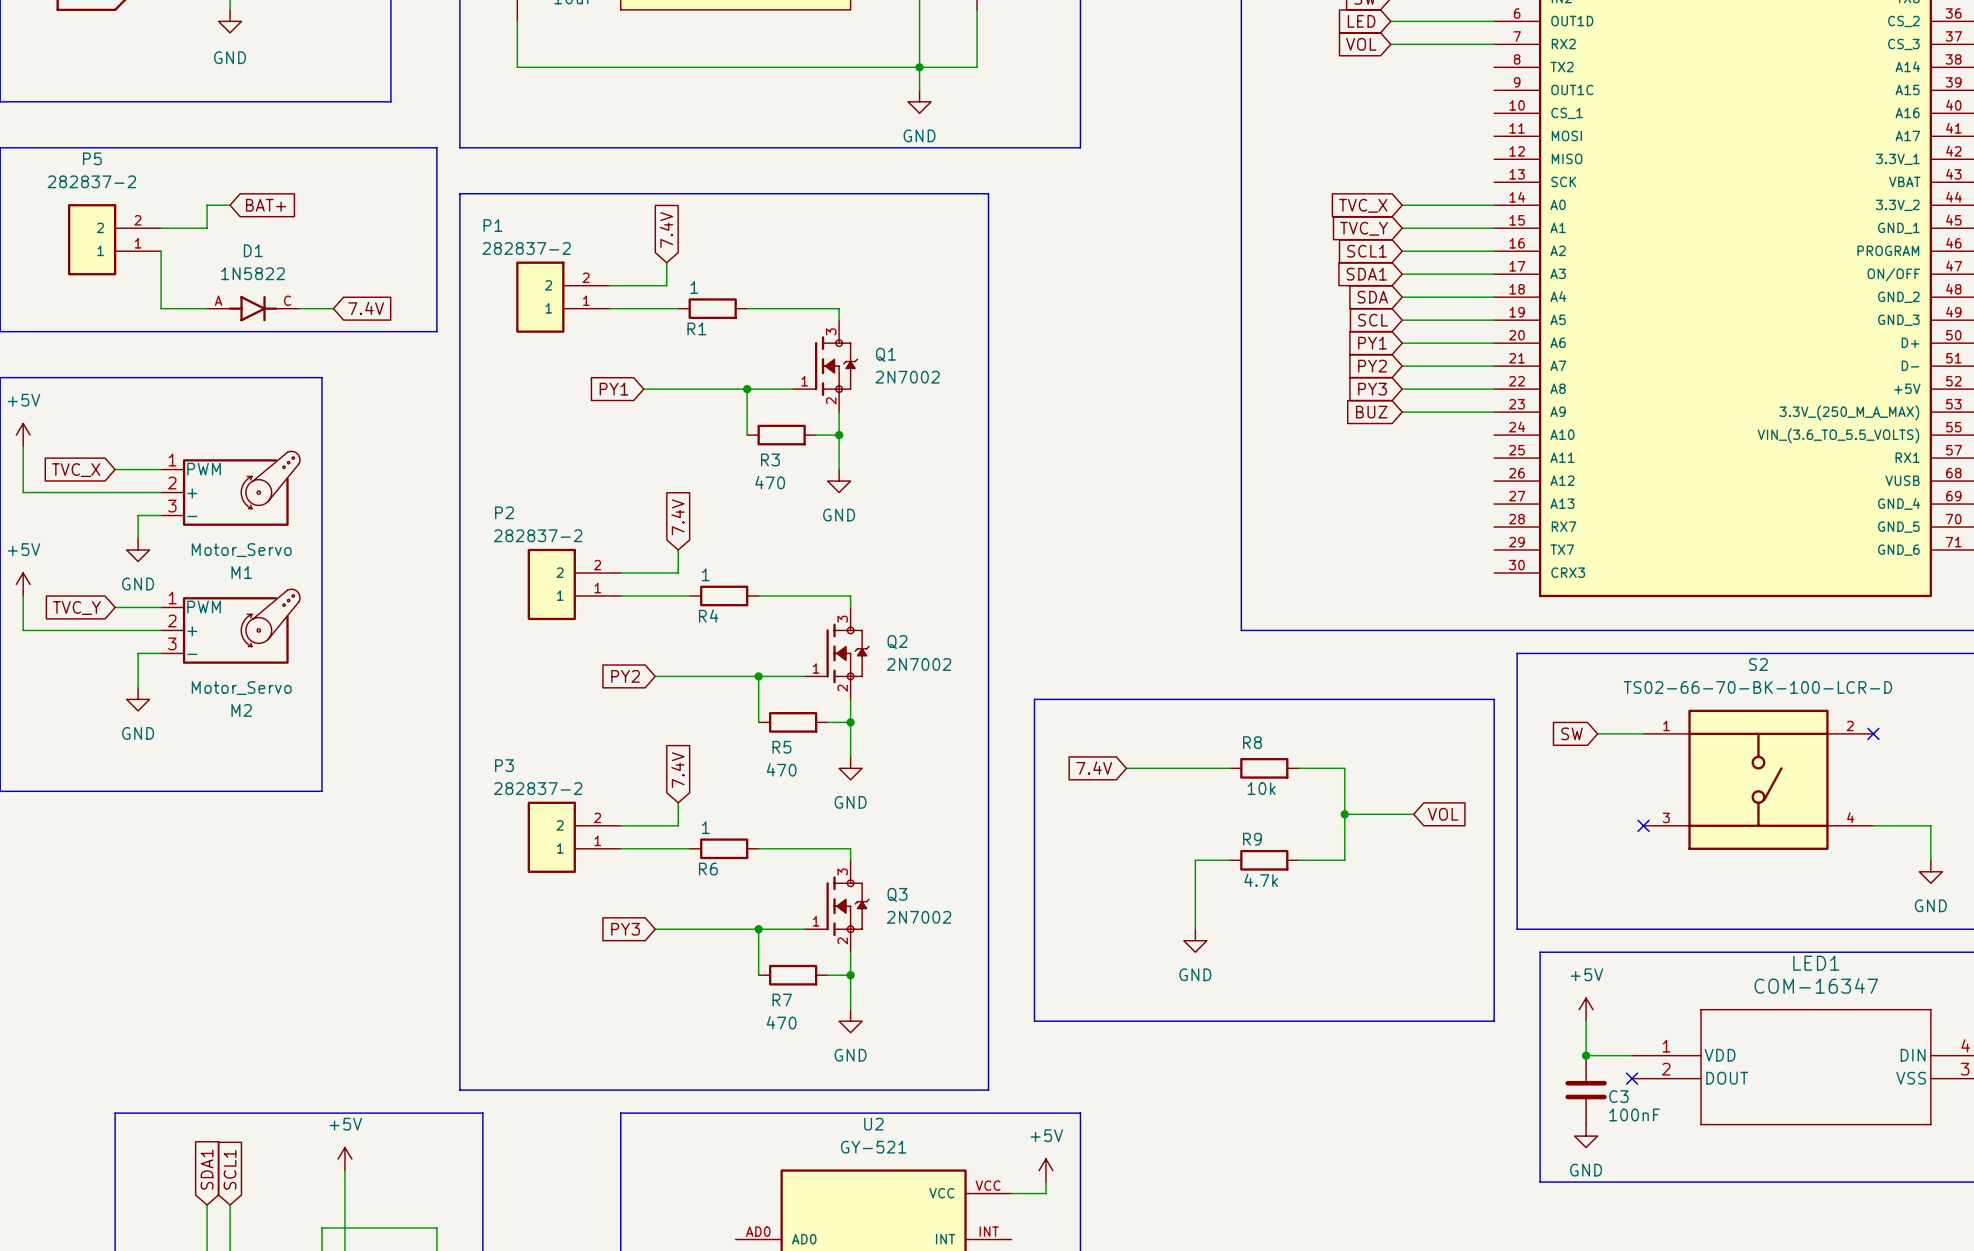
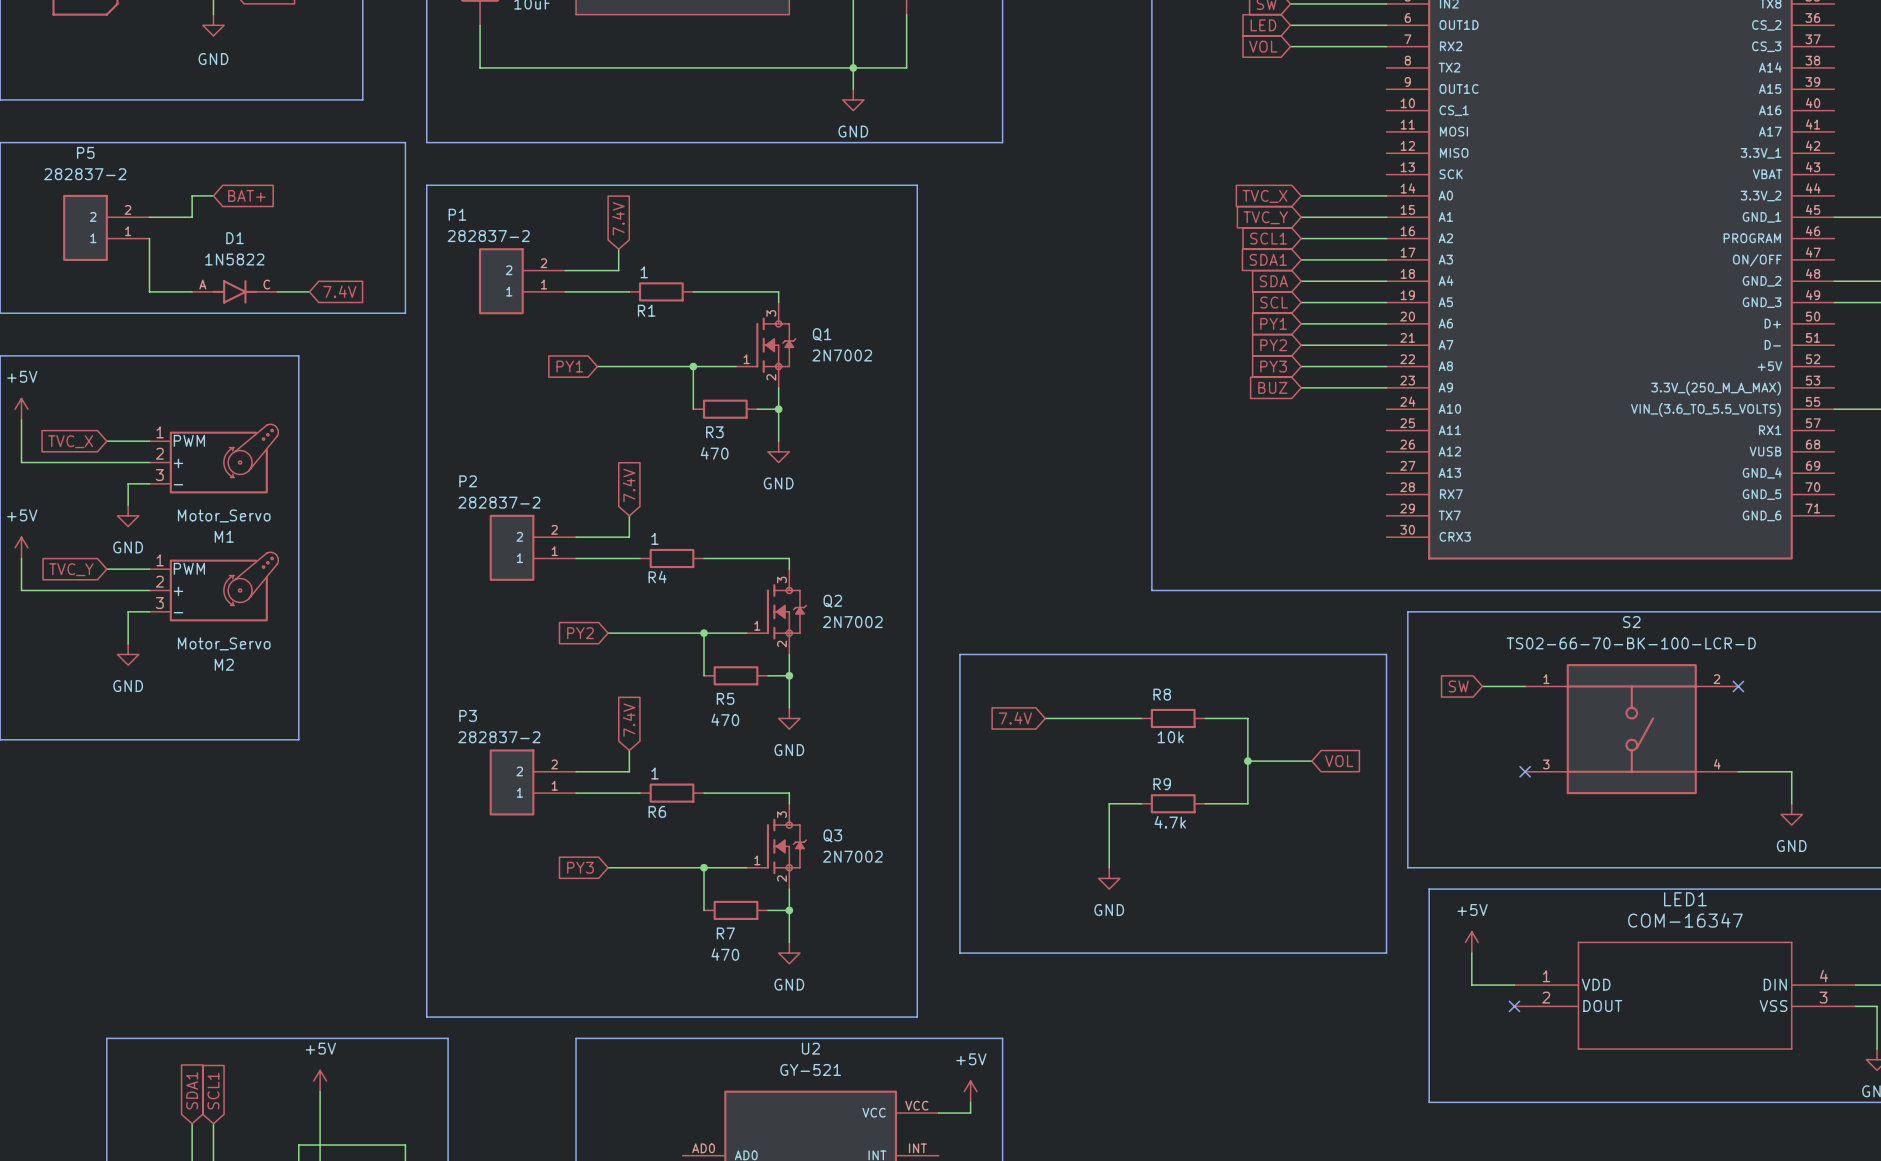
junction: (1586, 1055) -> none
C3: 100nF (1586, 1090) -> none
power symbol: GND (1586, 1136) -> none

